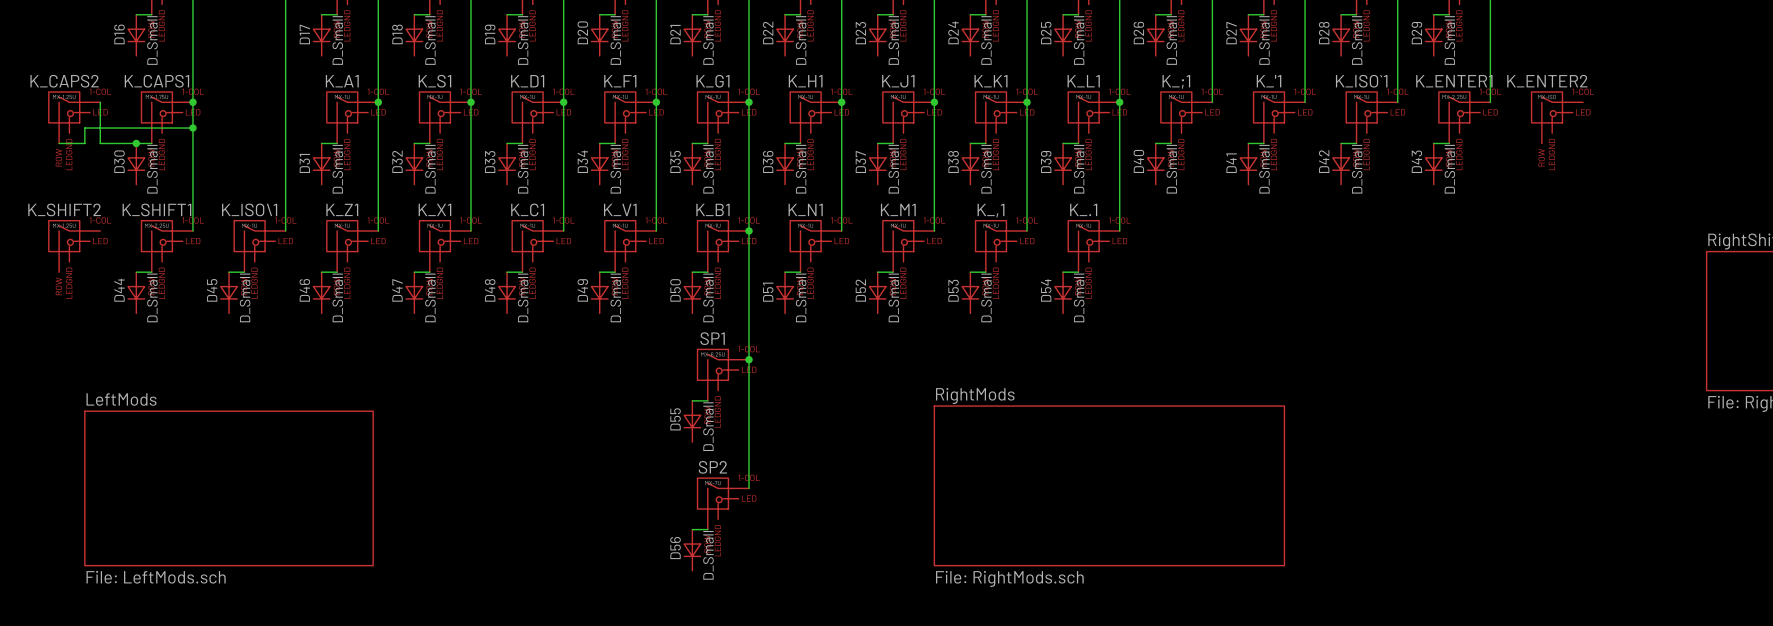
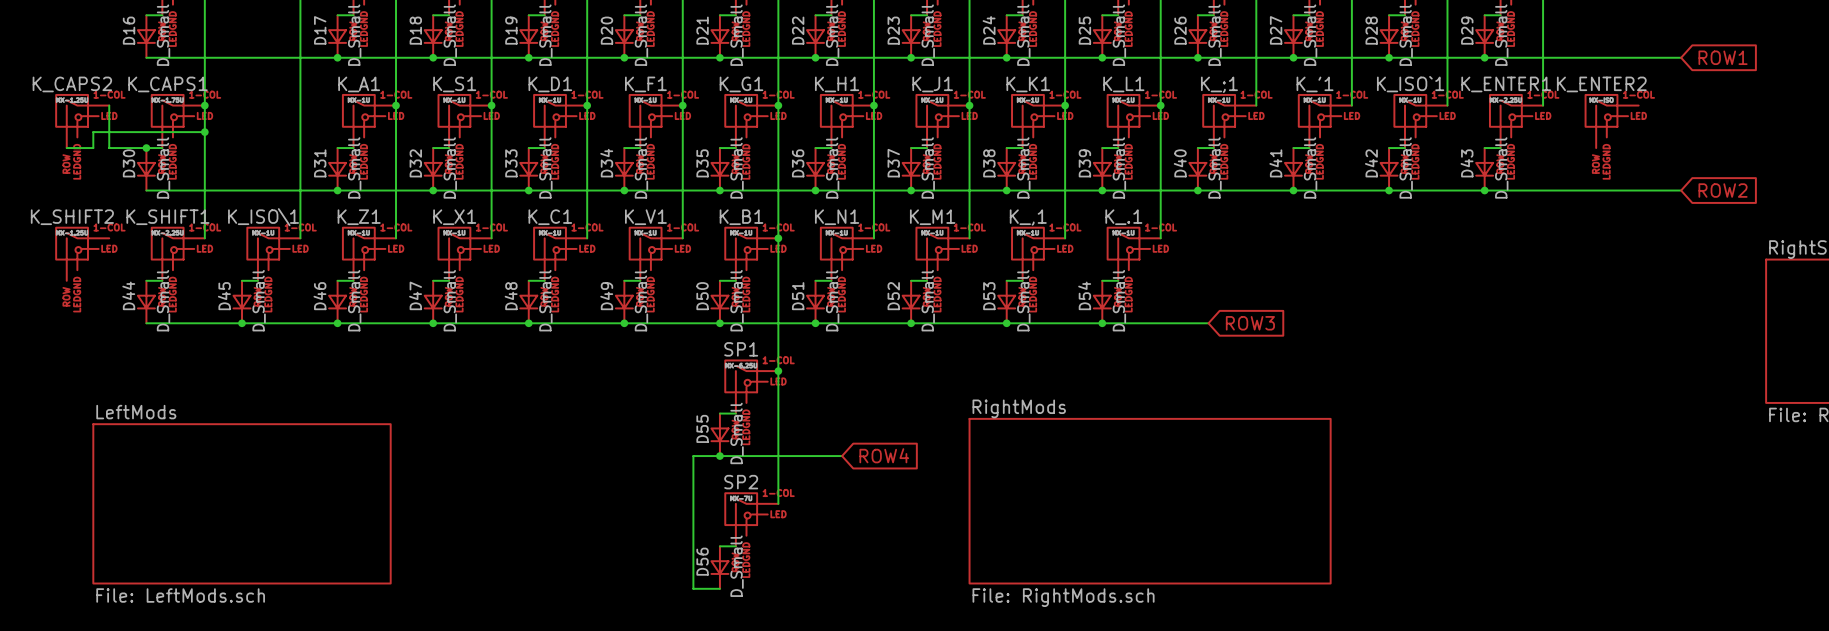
wire: none -> (146, 57) (1681, 57)
junction: none -> (337, 57)
junction: none -> (433, 57)
junction: none -> (528, 57)
junction: none -> (624, 57)
junction: none -> (719, 57)
junction: none -> (815, 57)
junction: none -> (911, 57)
junction: none -> (1006, 57)
junction: none -> (1102, 57)
junction: none -> (1197, 57)
junction: none -> (1293, 57)
junction: none -> (1389, 57)
junction: none -> (1484, 57)
global label: none -> ROW1 (1723, 57)
wire: none -> (146, 190) (1681, 190)
junction: none -> (337, 190)
junction: none -> (433, 190)
junction: none -> (528, 190)
junction: none -> (624, 190)
junction: none -> (719, 190)
junction: none -> (815, 190)
junction: none -> (911, 190)
junction: none -> (1006, 190)
junction: none -> (1102, 190)
junction: none -> (1197, 190)
junction: none -> (1293, 190)
junction: none -> (1389, 190)
junction: none -> (1484, 190)
global label: none -> ROW2 (1723, 190)
wire: none -> (146, 323) (1208, 323)
junction: none -> (242, 323)
junction: none -> (337, 323)
junction: none -> (433, 323)
junction: none -> (528, 323)
junction: none -> (624, 323)
junction: none -> (719, 323)
junction: none -> (815, 323)
junction: none -> (911, 323)
junction: none -> (1006, 323)
junction: none -> (1102, 323)
global label: none -> ROW3 (1250, 323)
junction: none -> (719, 456)
wire: none -> (842, 456) (693, 456) (693, 588) (719, 588)
global label: none -> ROW4 (884, 455)

